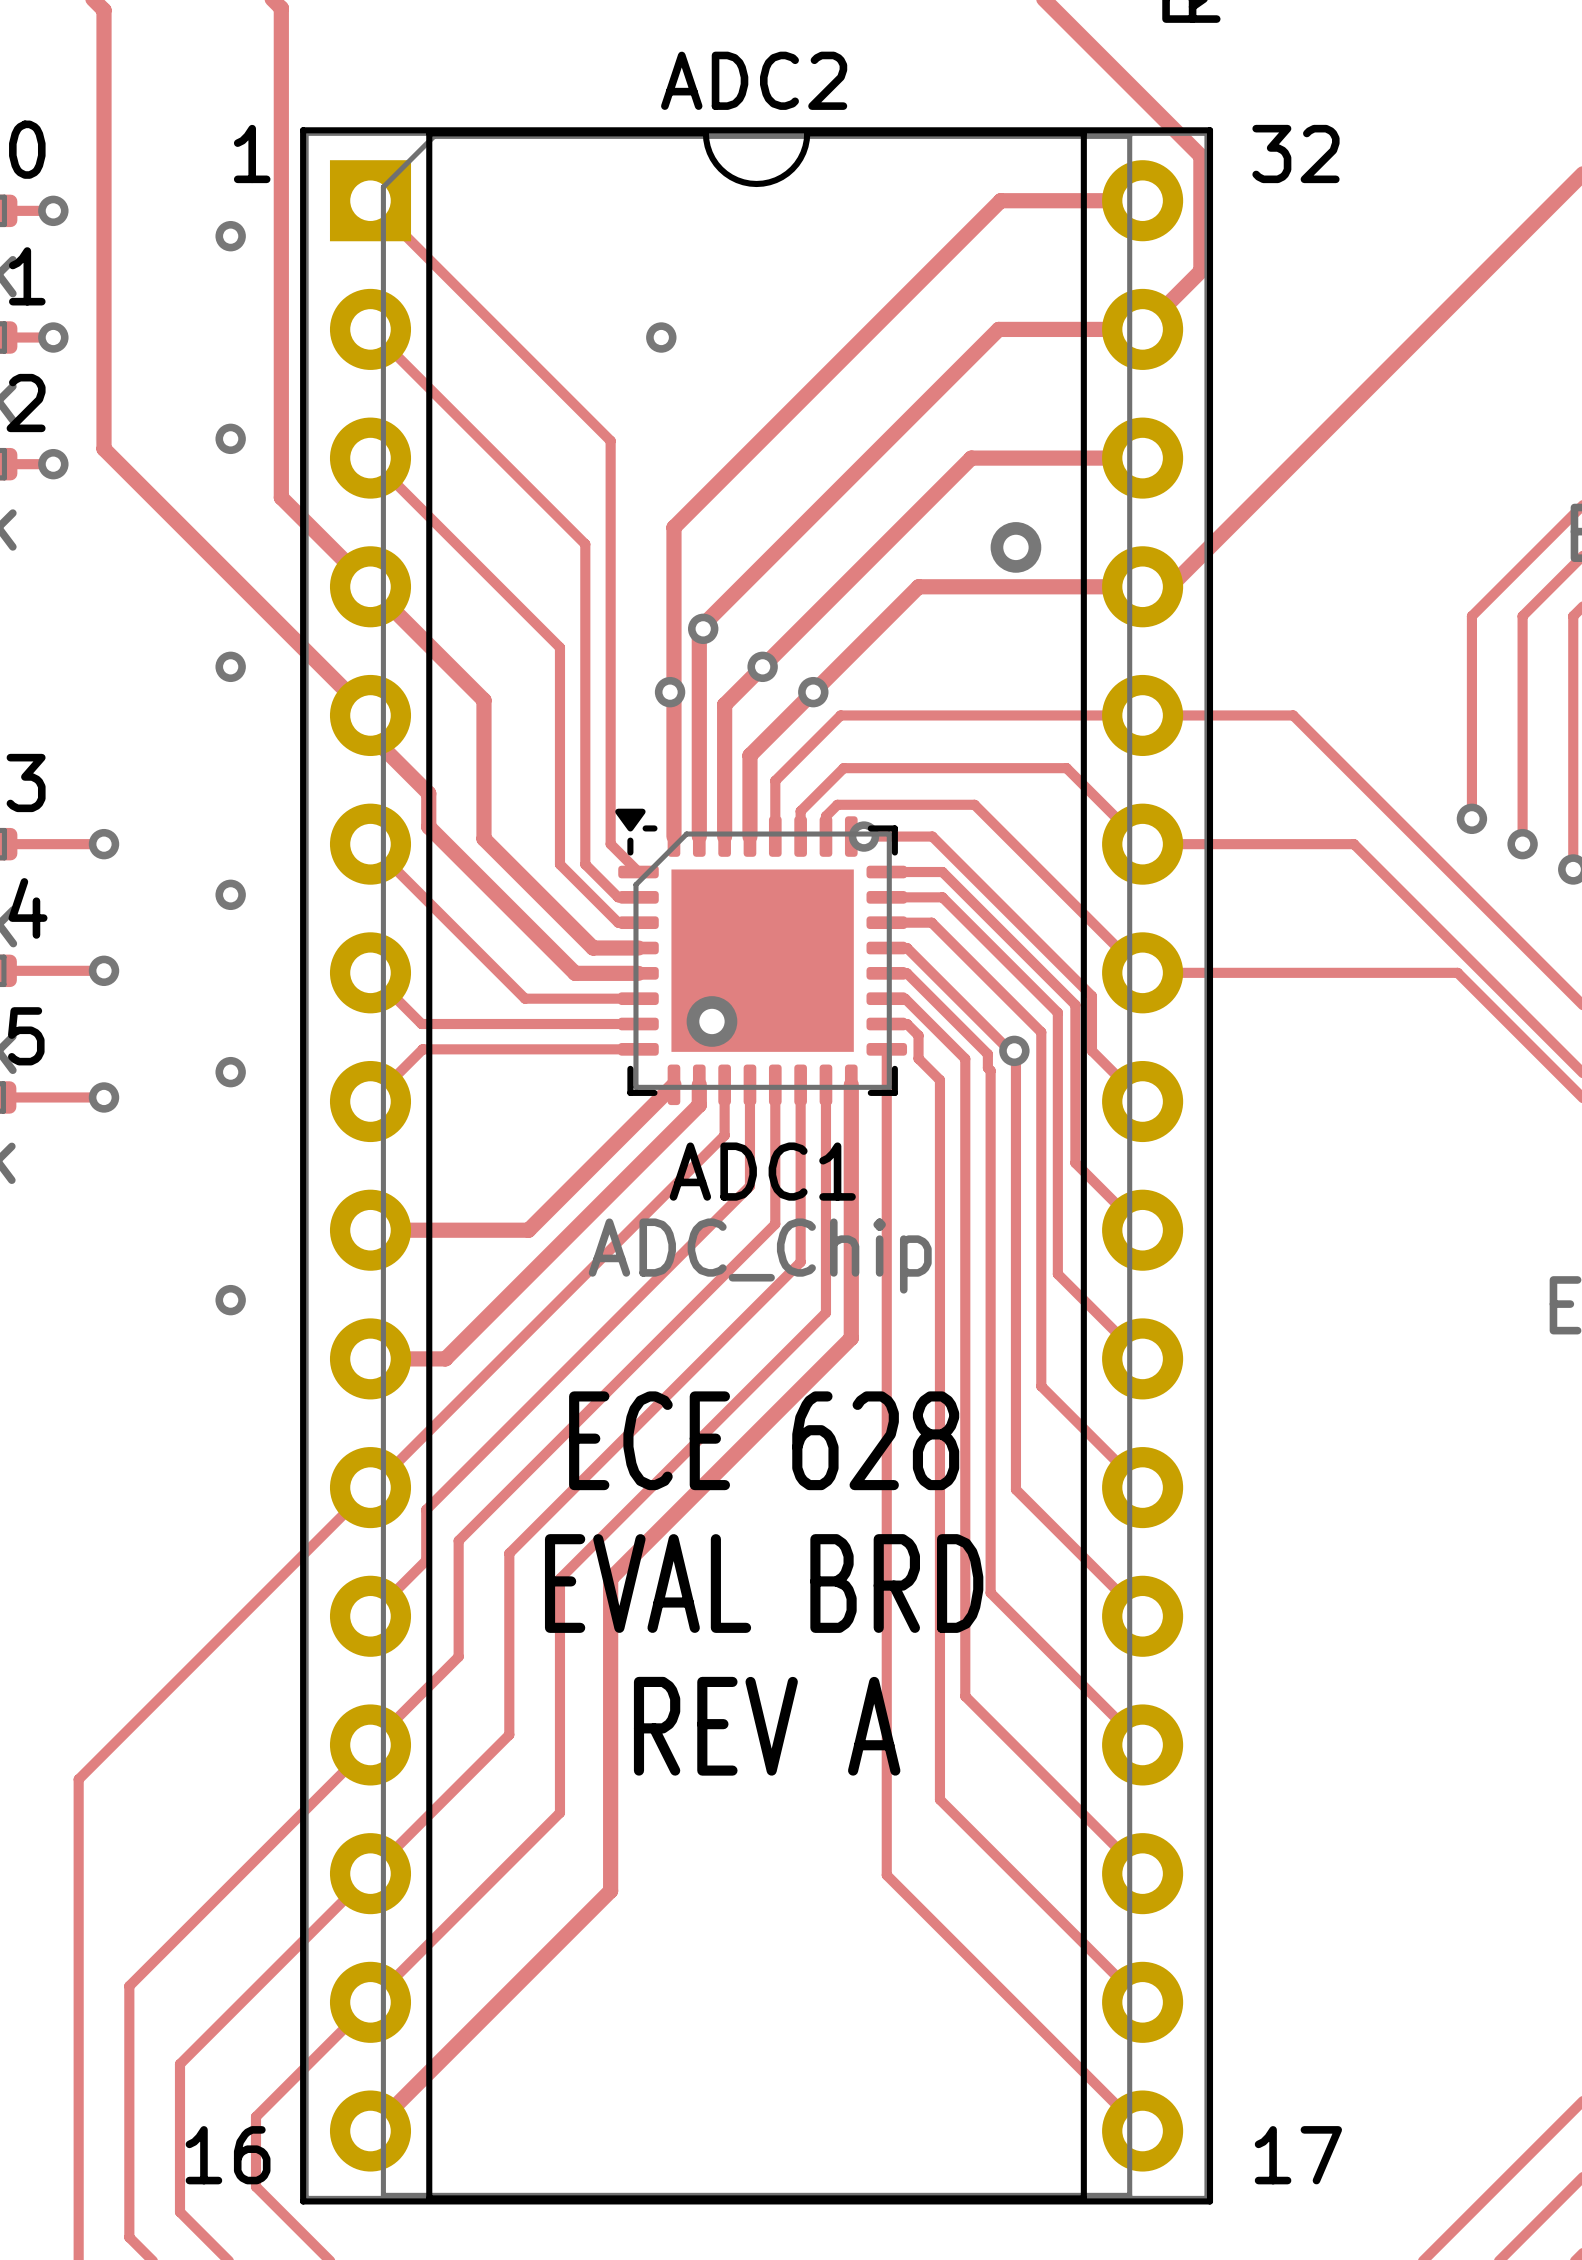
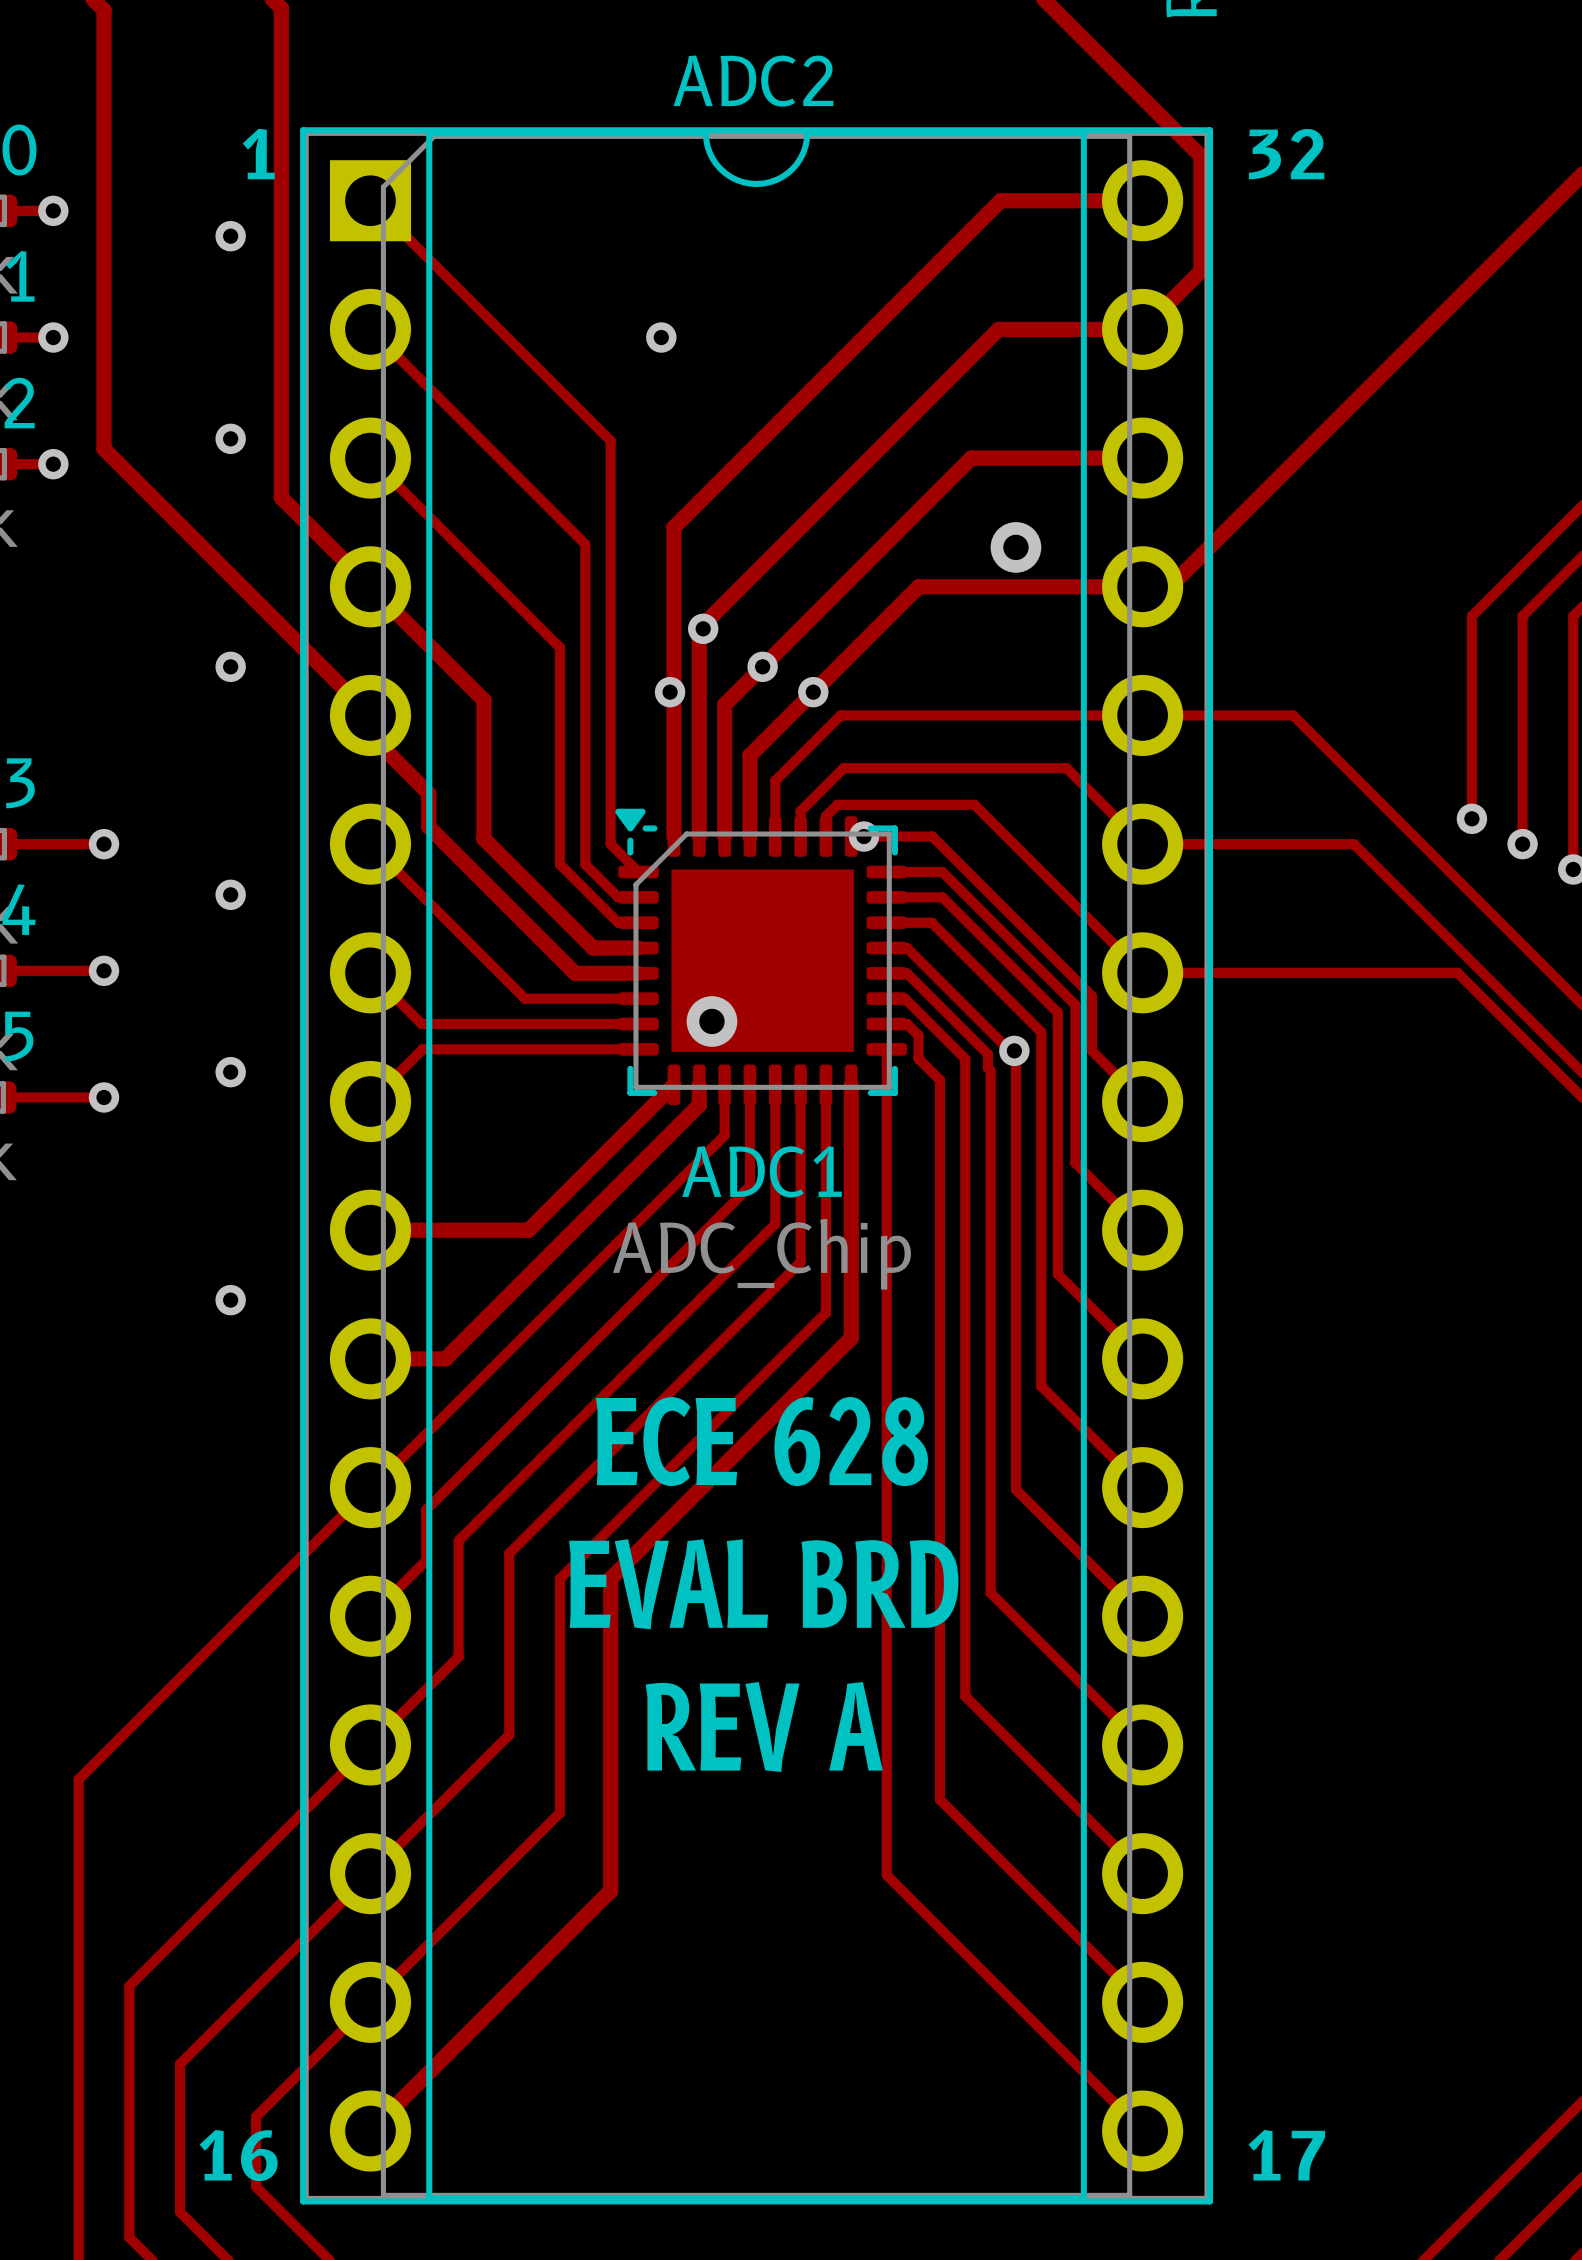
ADC2 footprint: [300, 127, 1214, 2205] -> [300, 127, 1214, 2205]

